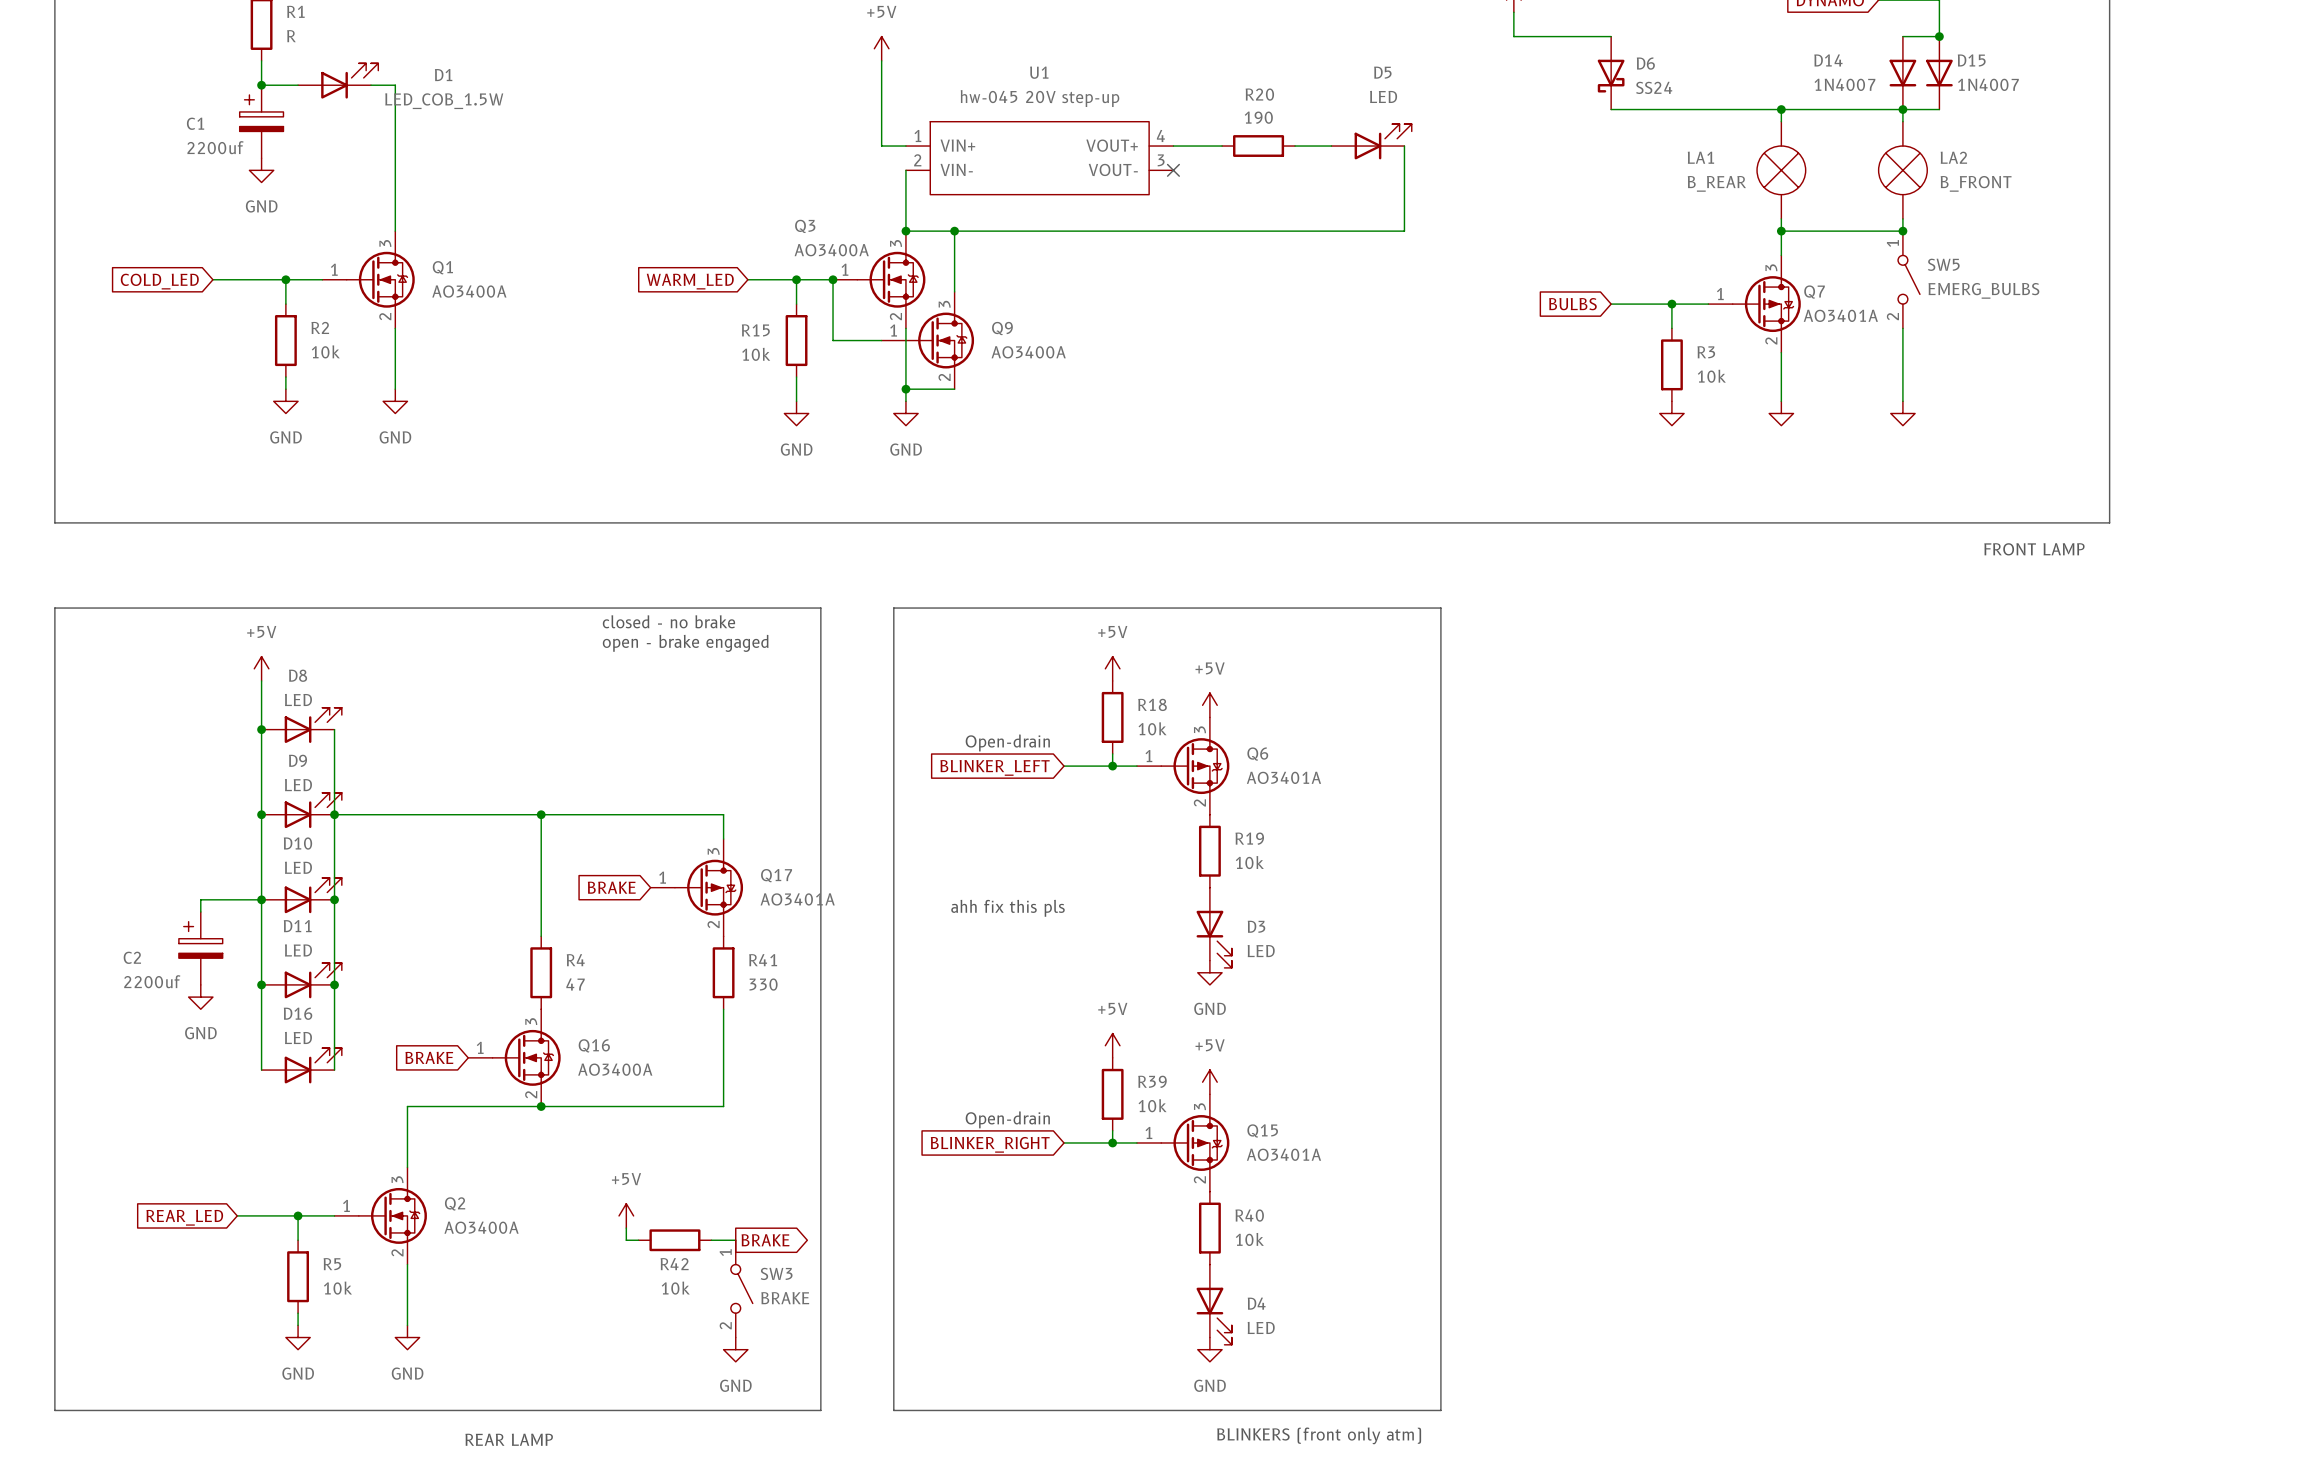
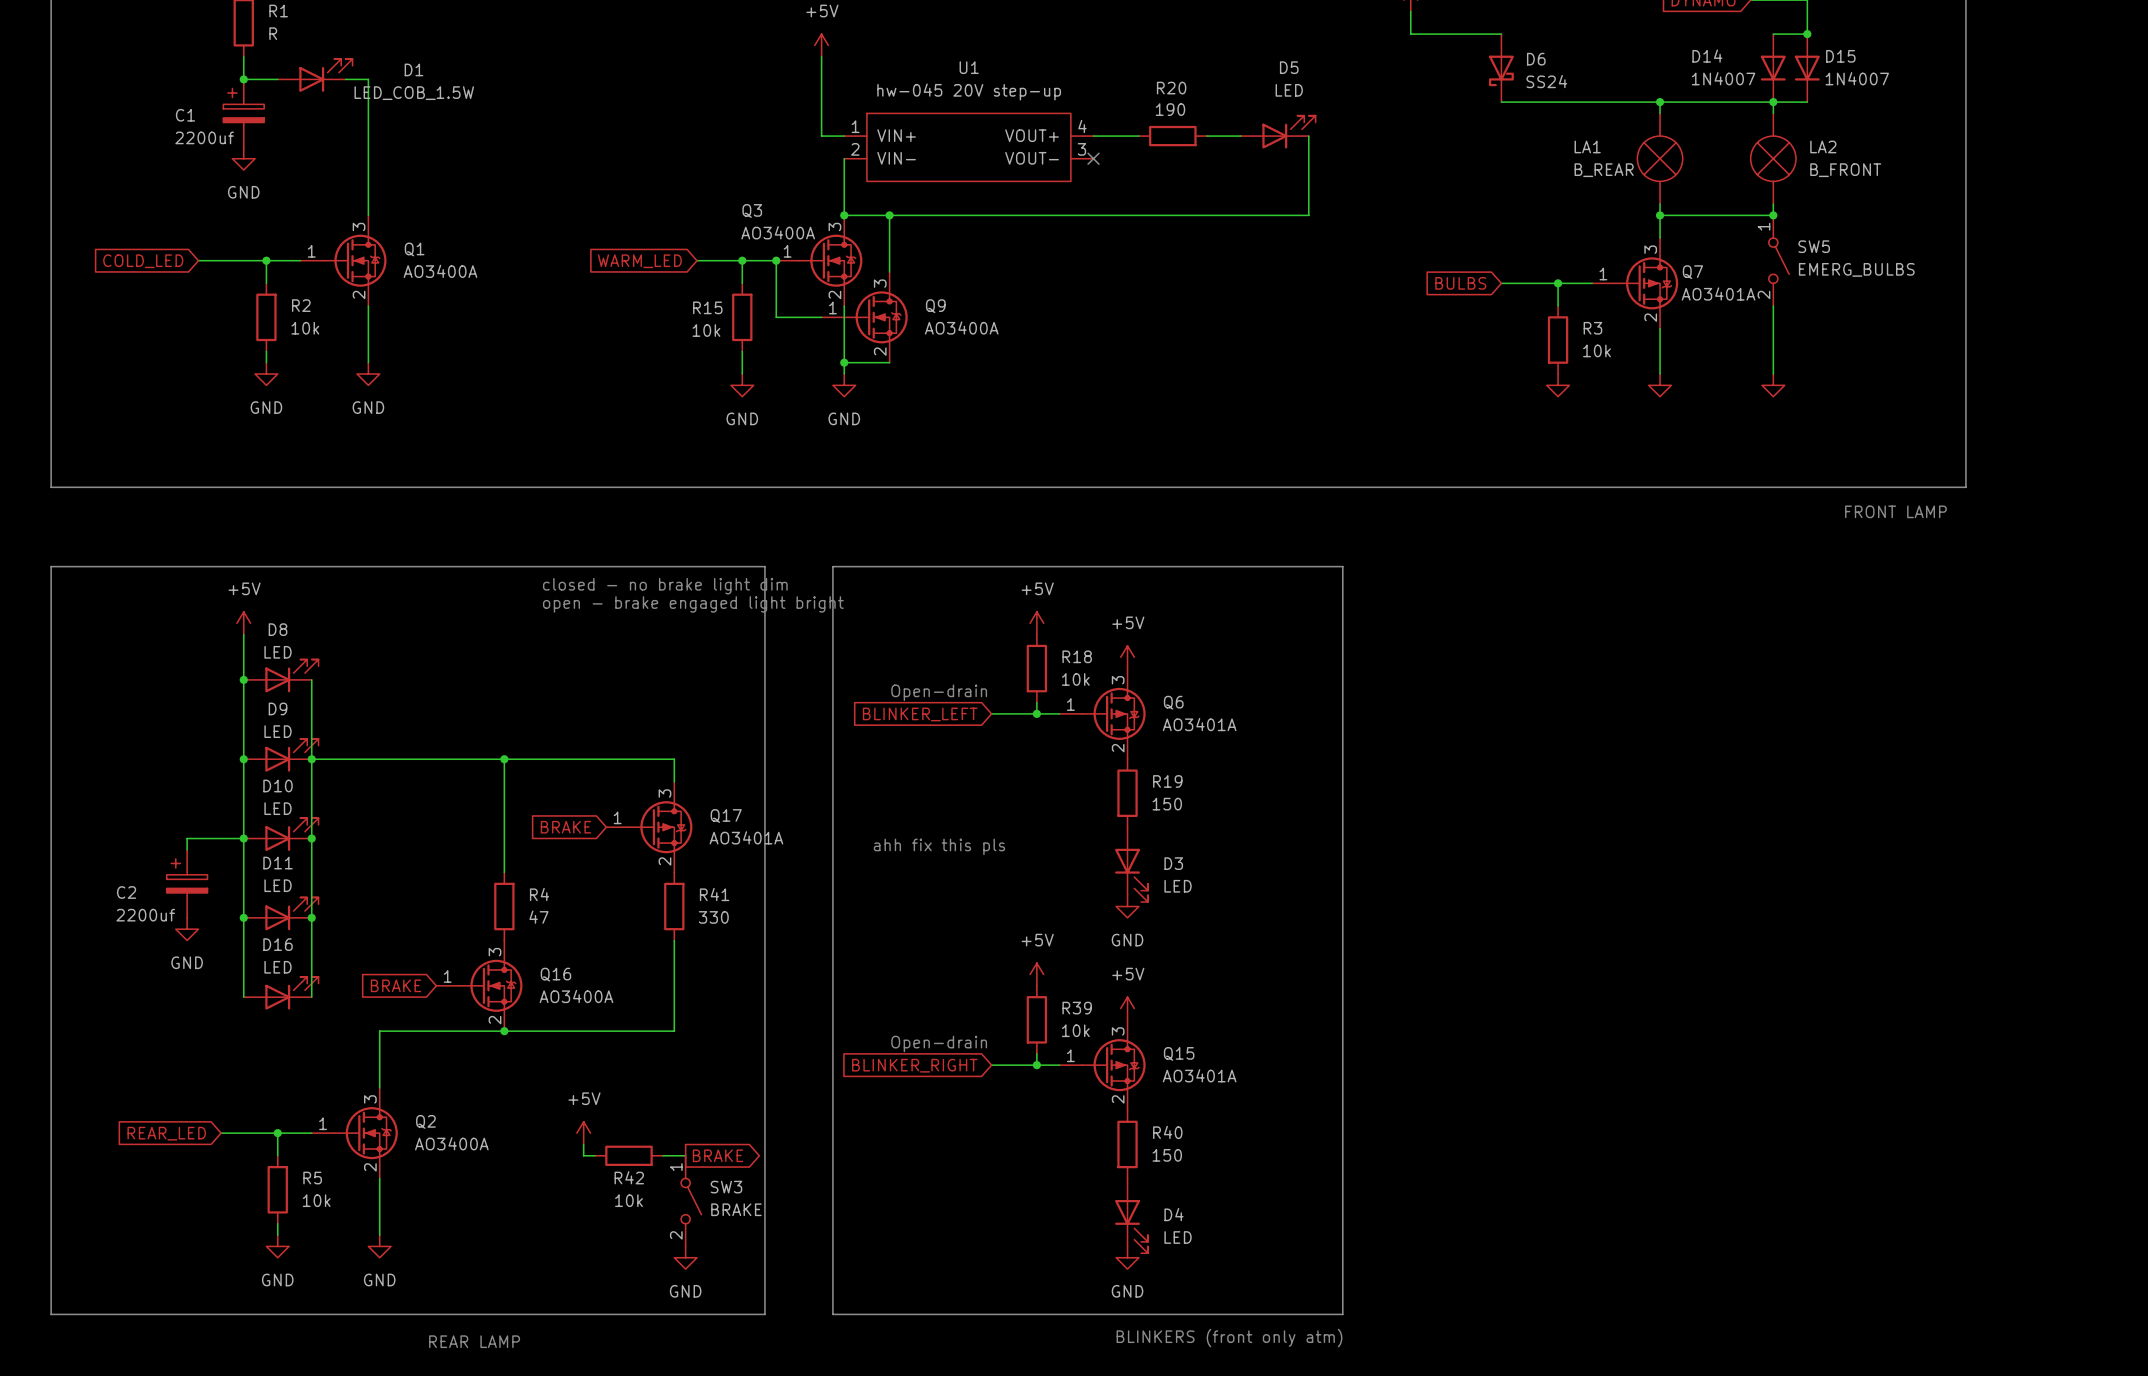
text: closed - no brake (668, 621) -> closed - no brake light dim (665, 586)
text: open - brake engaged (685, 643) -> open - brake engaged light bright (693, 604)
R19 value: 10k (1249, 862) -> 150 (1167, 804)
R40 value: 10k (1249, 1239) -> 150 (1167, 1155)

